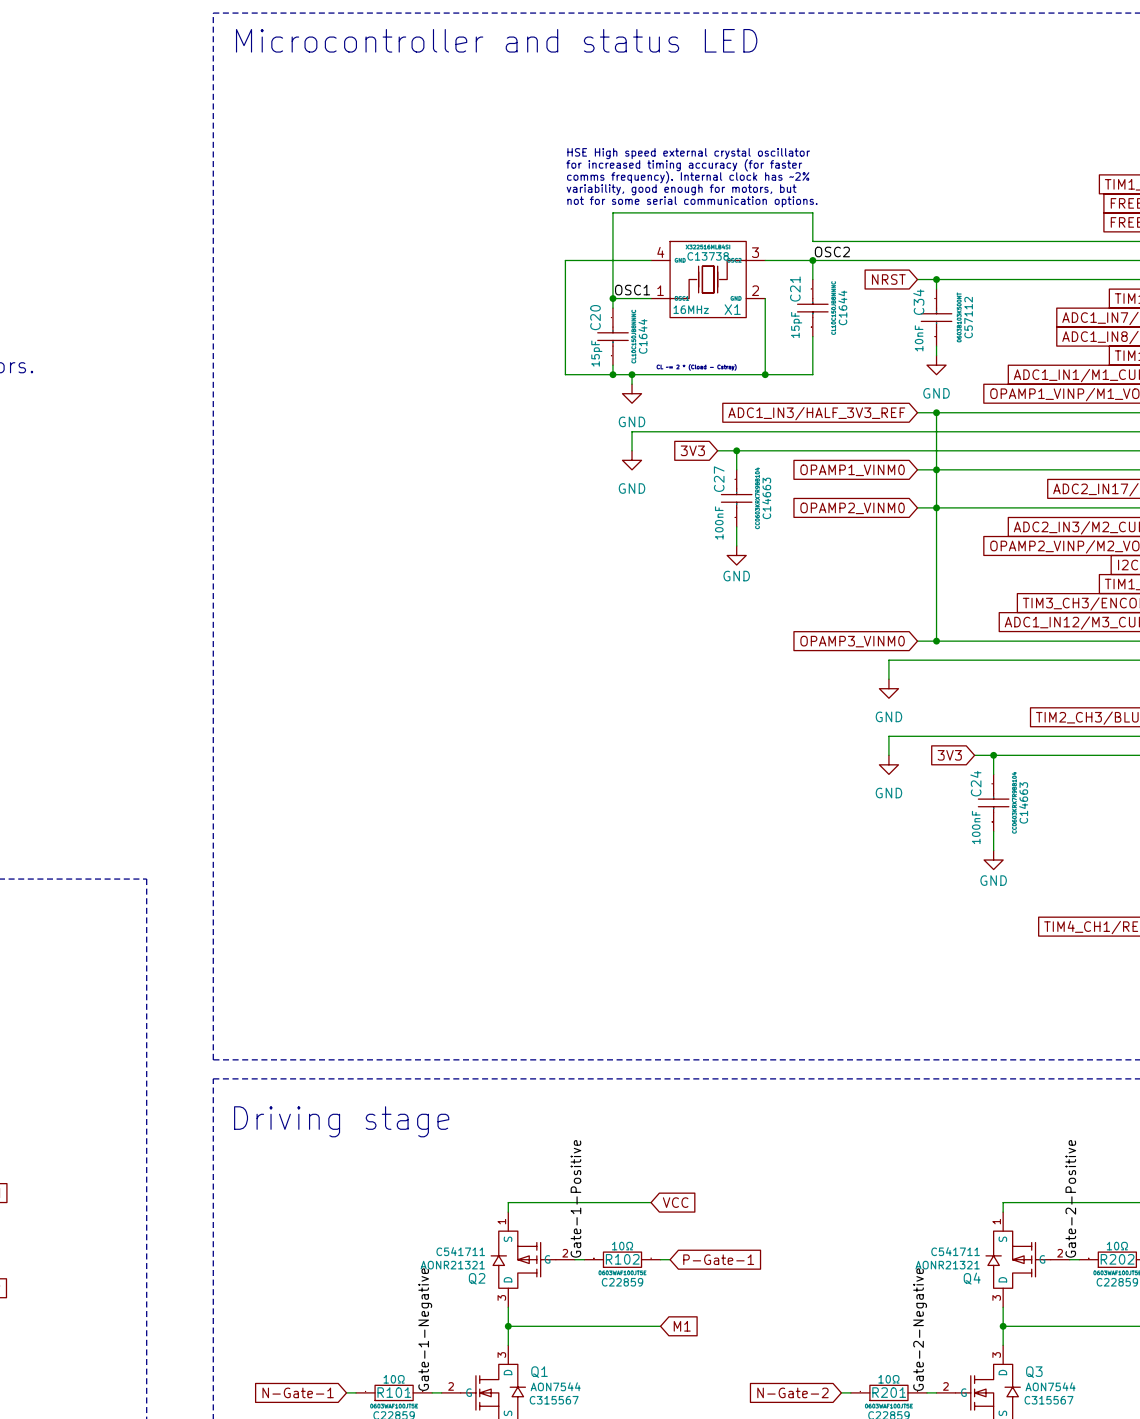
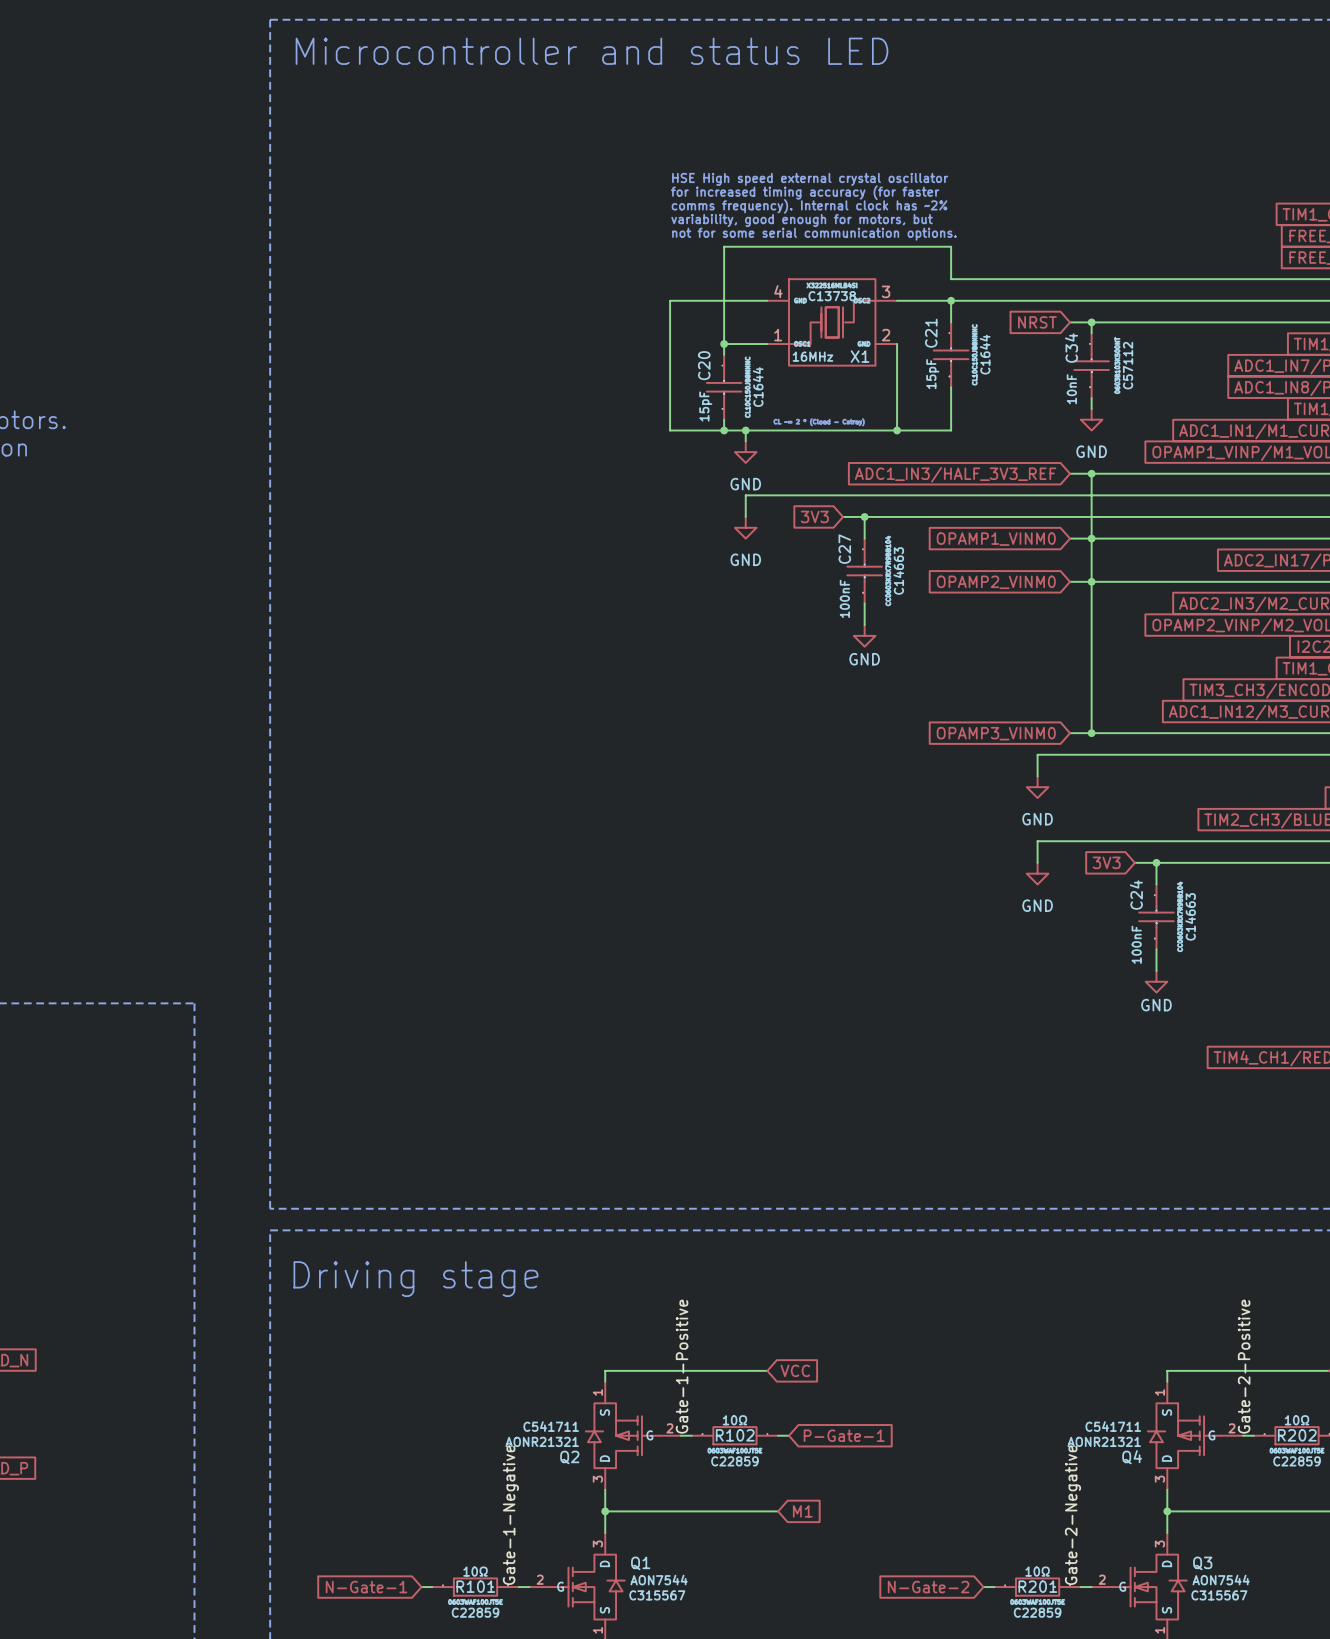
label: OSC2 (832, 251) -> none
label: OSC1 (632, 290) -> none

